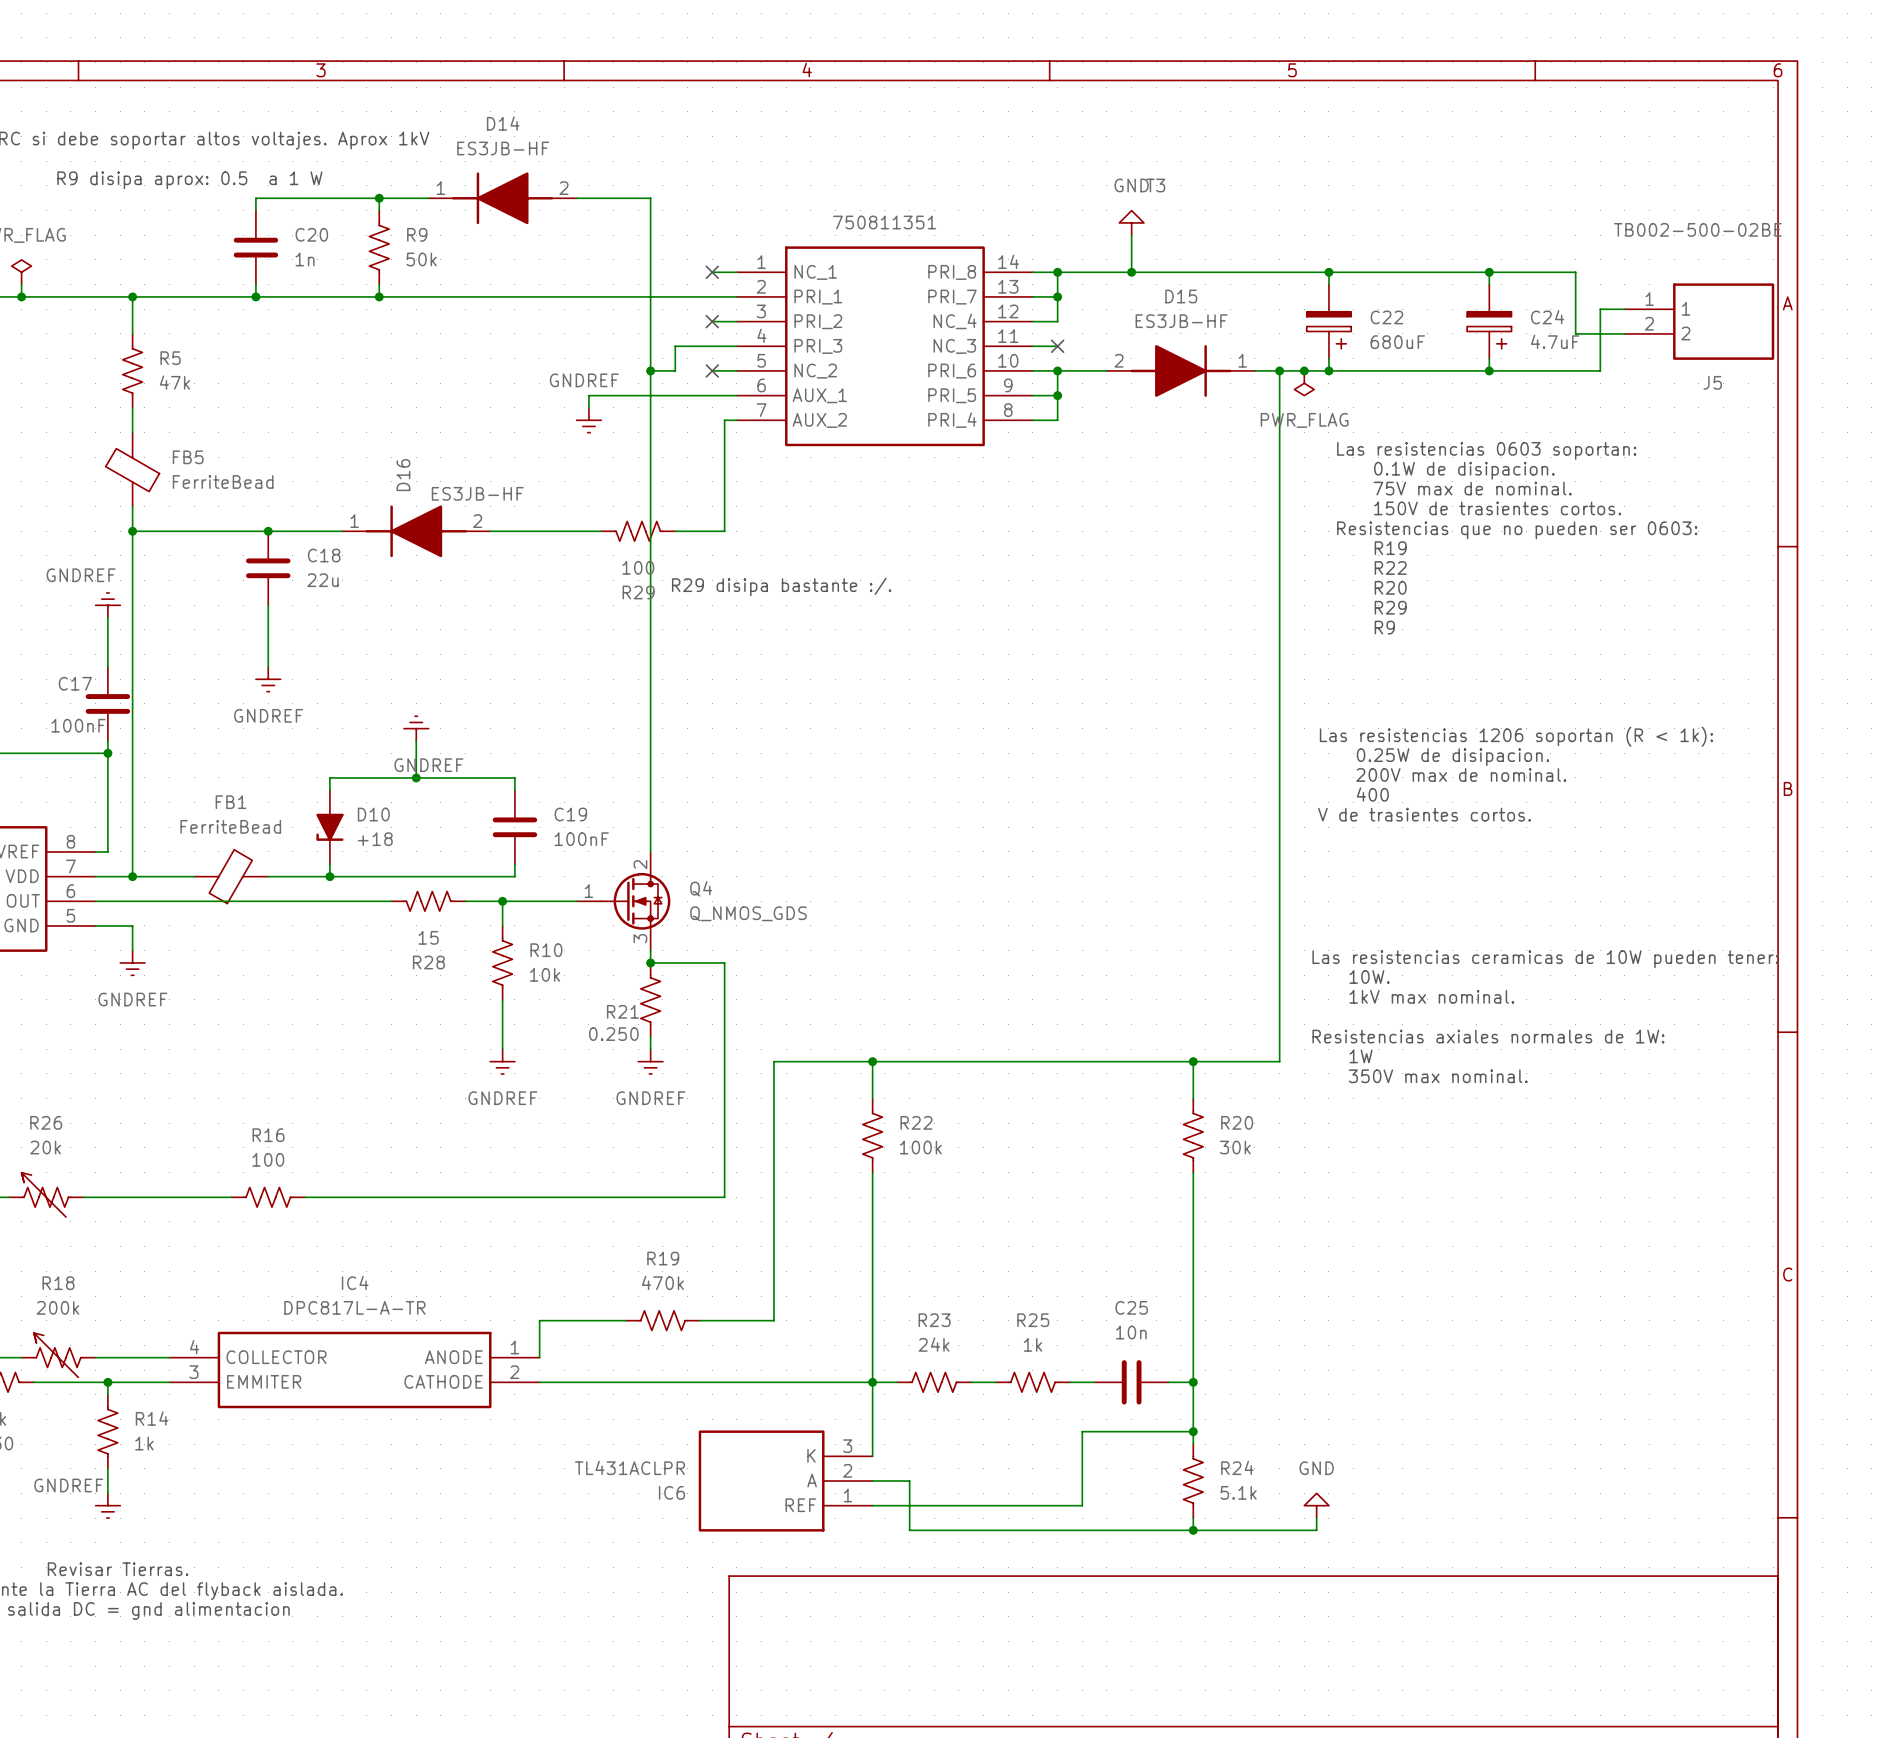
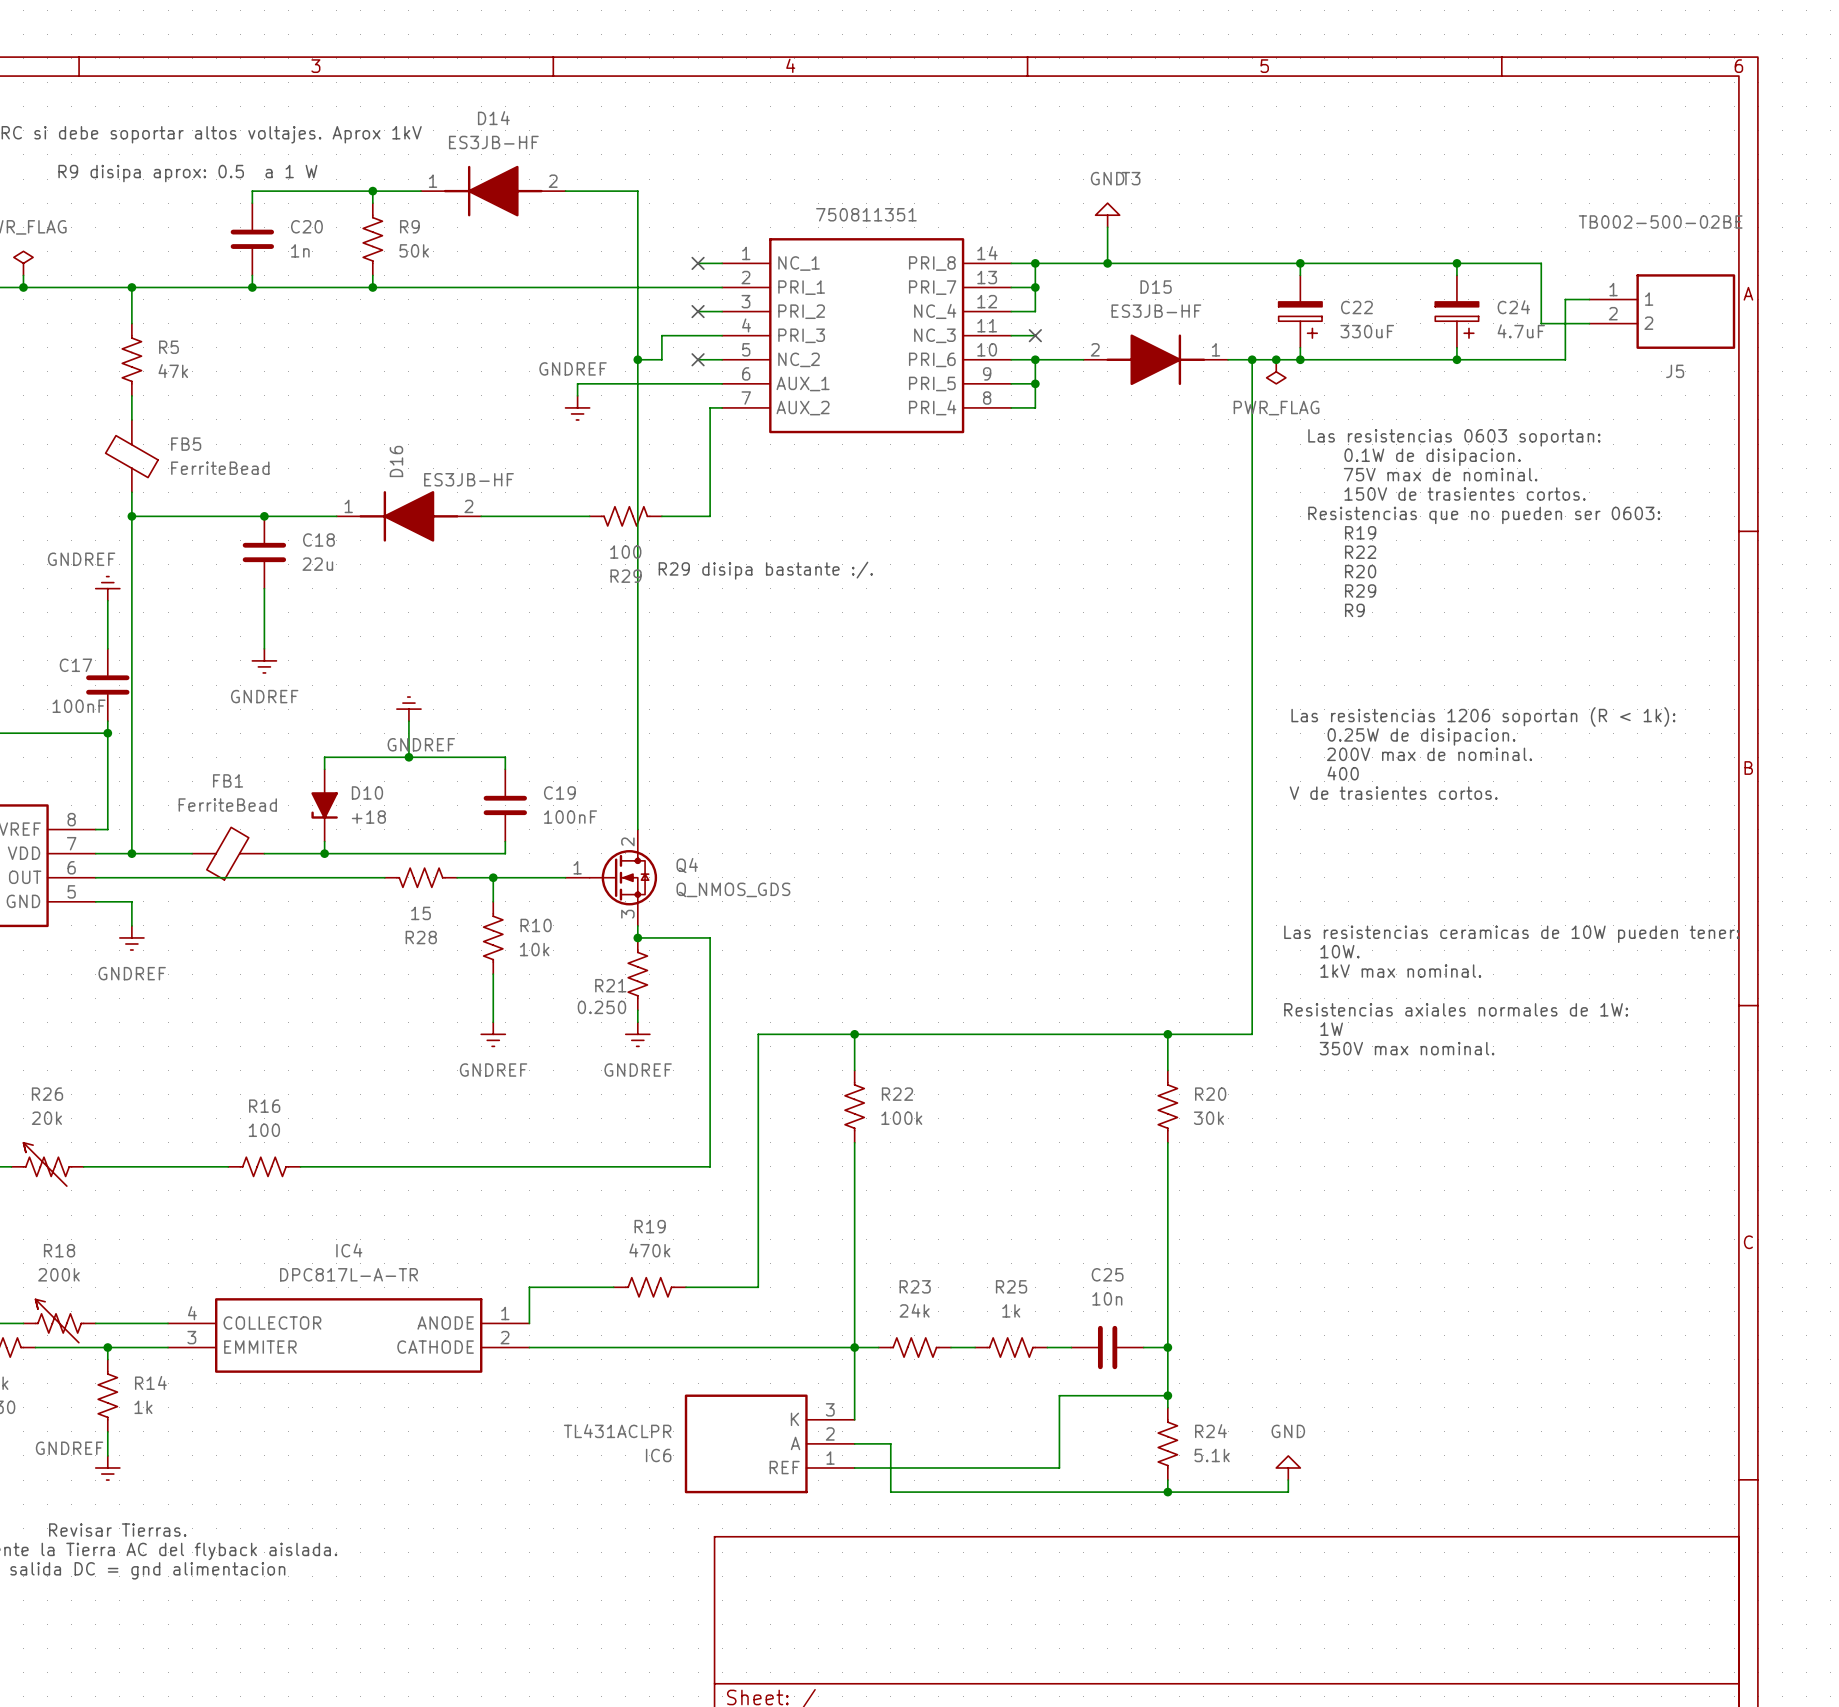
C22 value: 680uF (1397, 342) -> 330uF (1367, 331)

